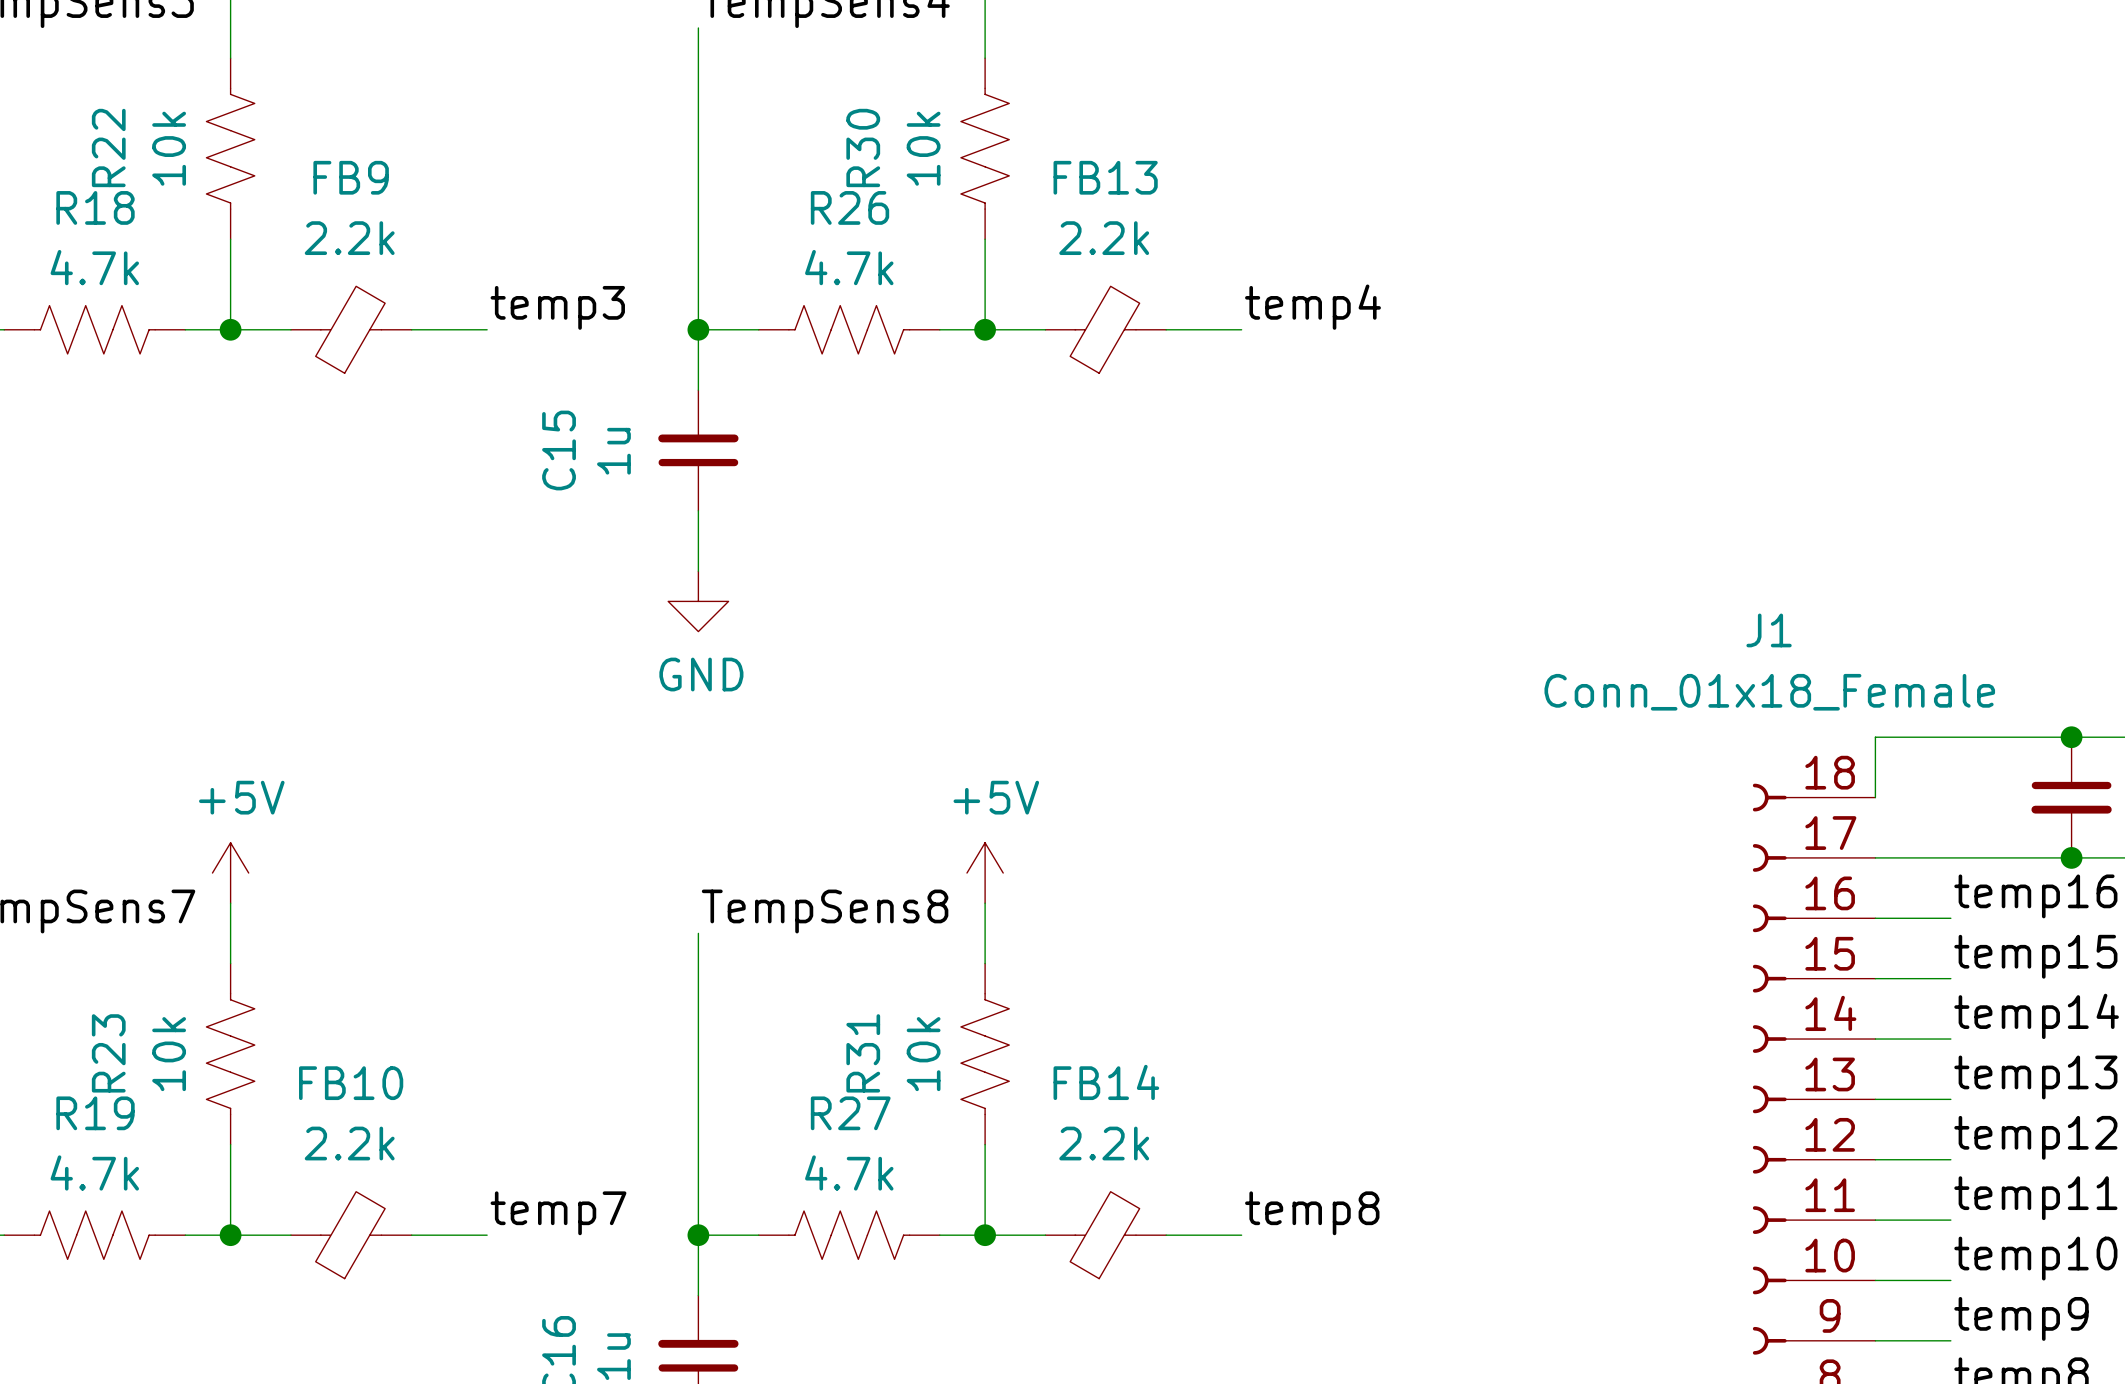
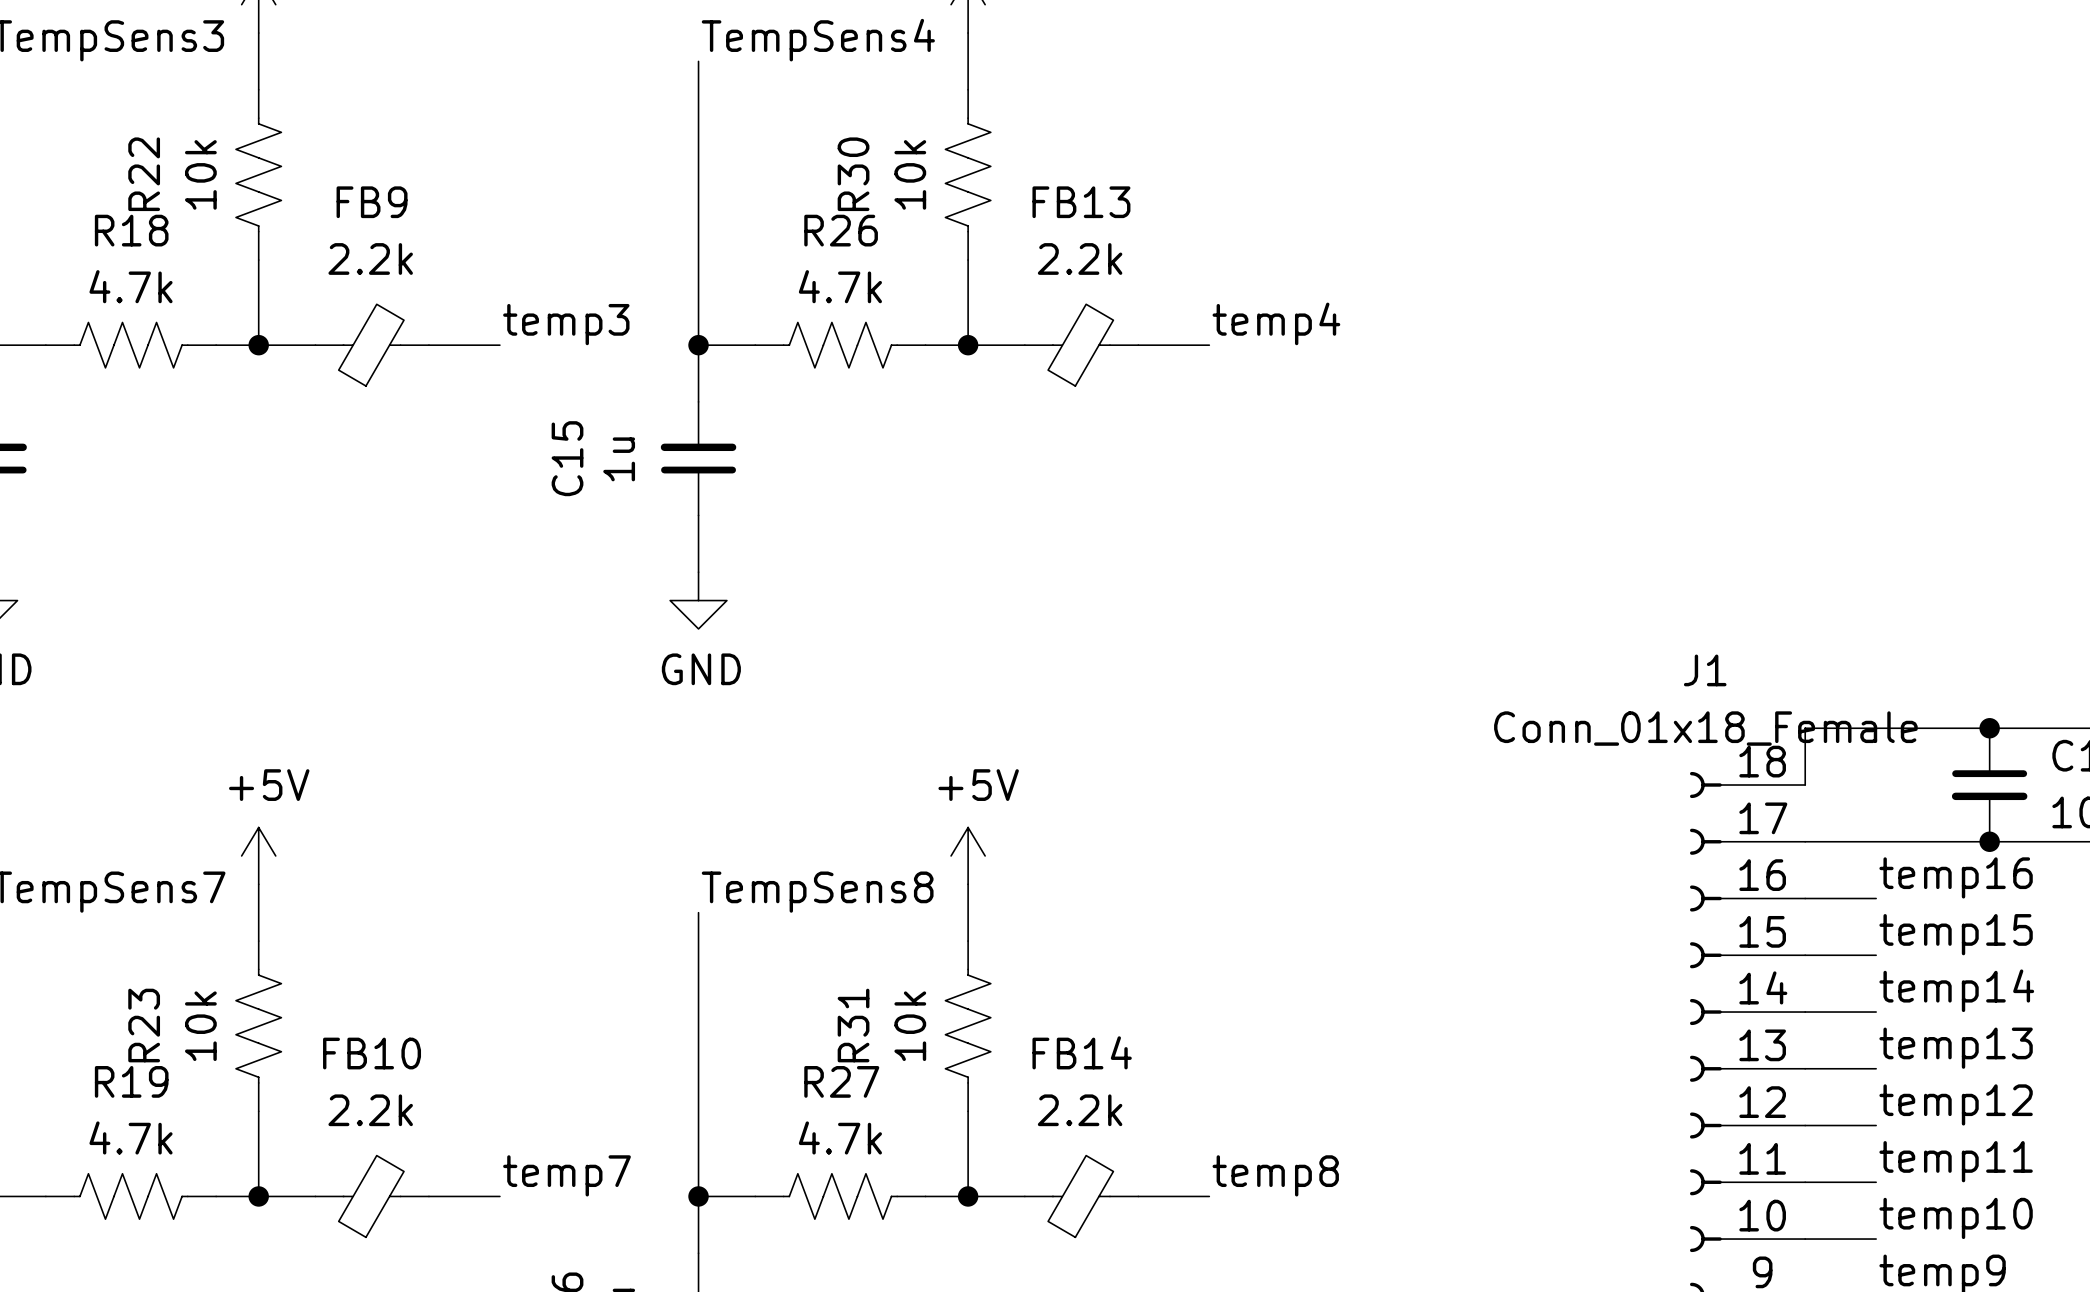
J1 name position: J1 (1769, 630) -> J1 (1705, 670)
J1 value position: Conn_01x18_Female (1769, 692) -> Conn_01x18_Female (1705, 728)

